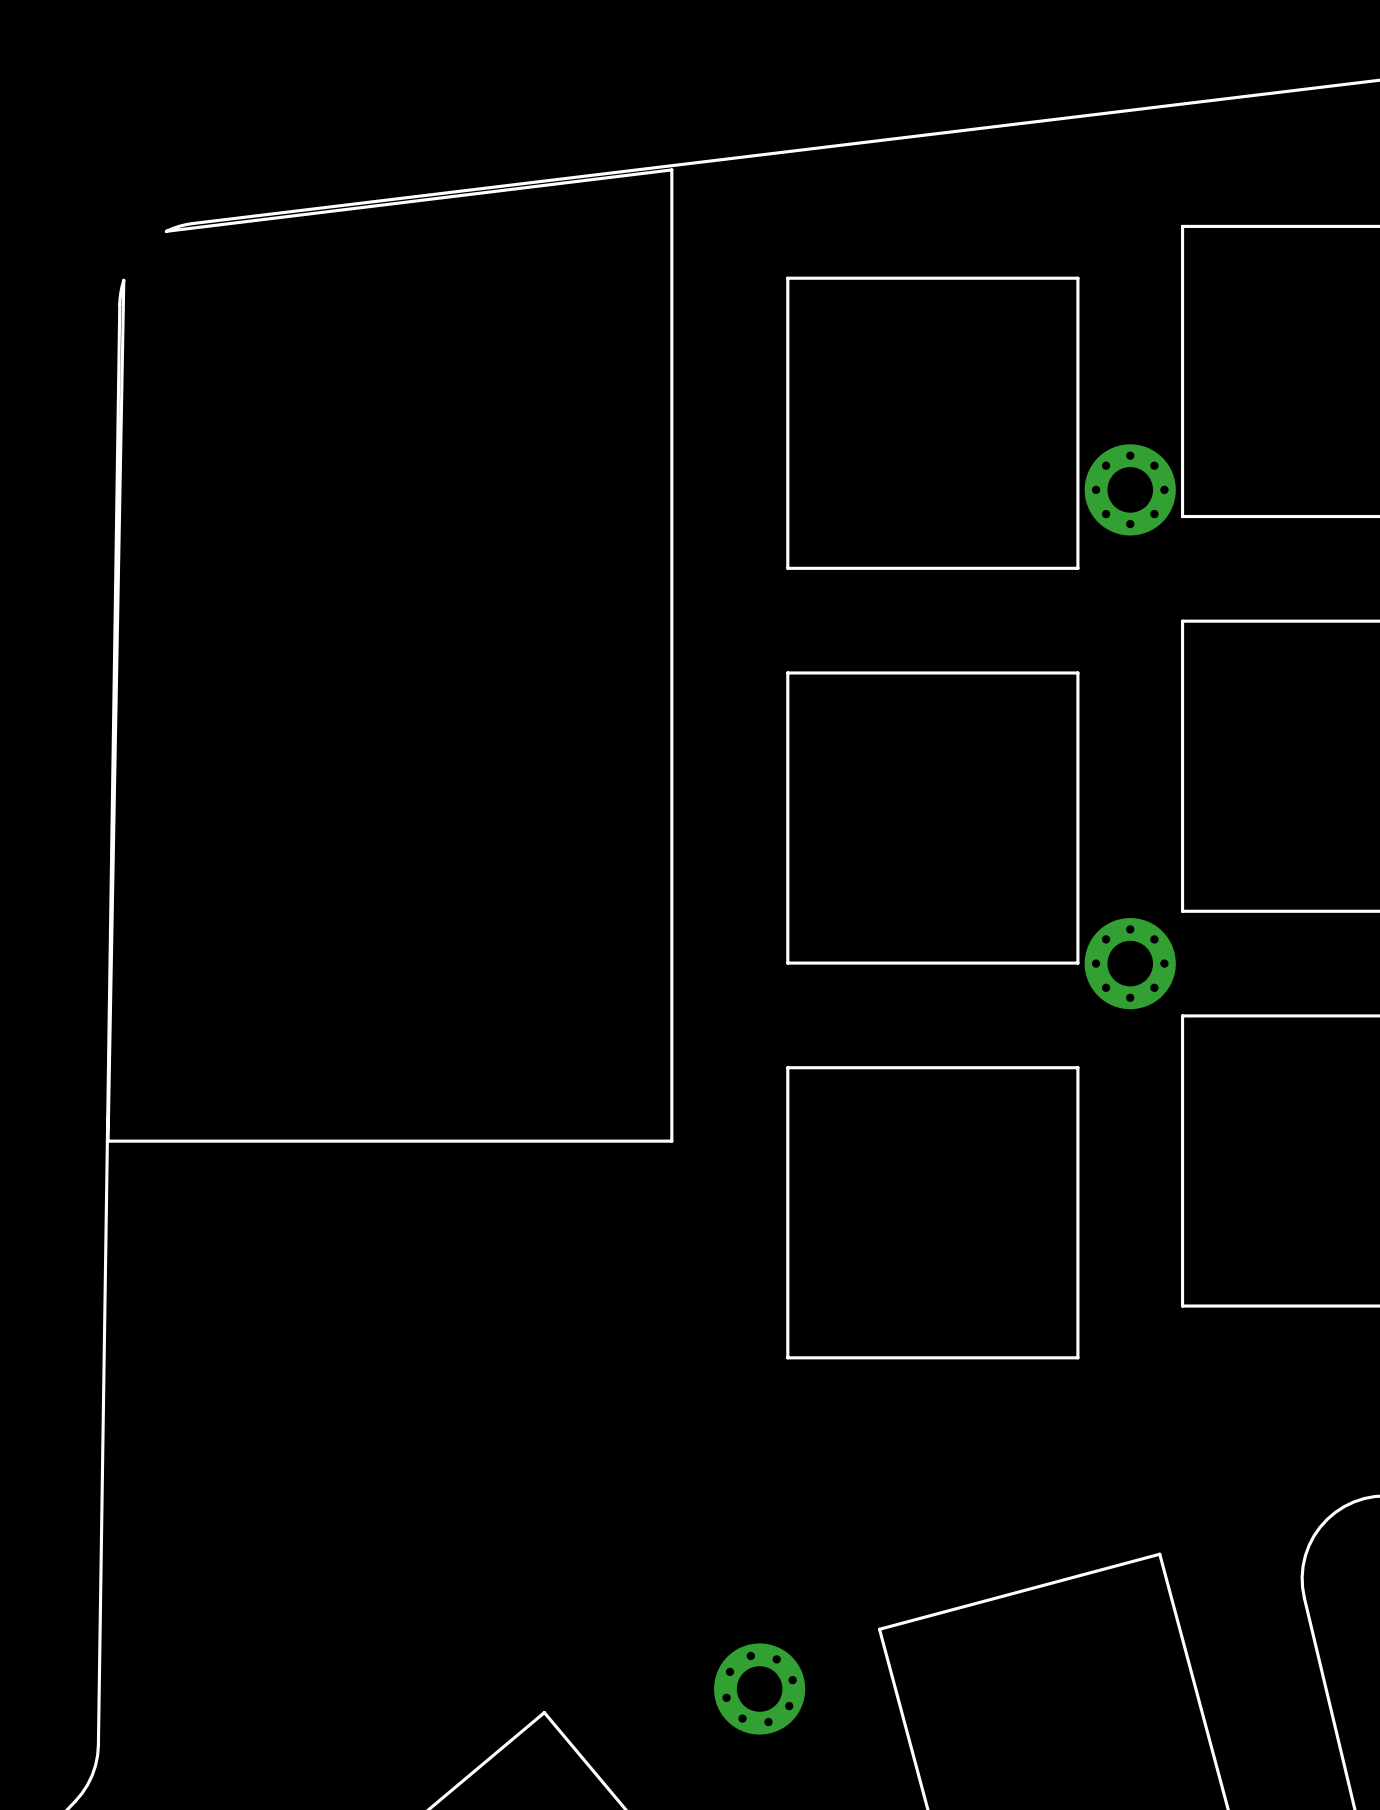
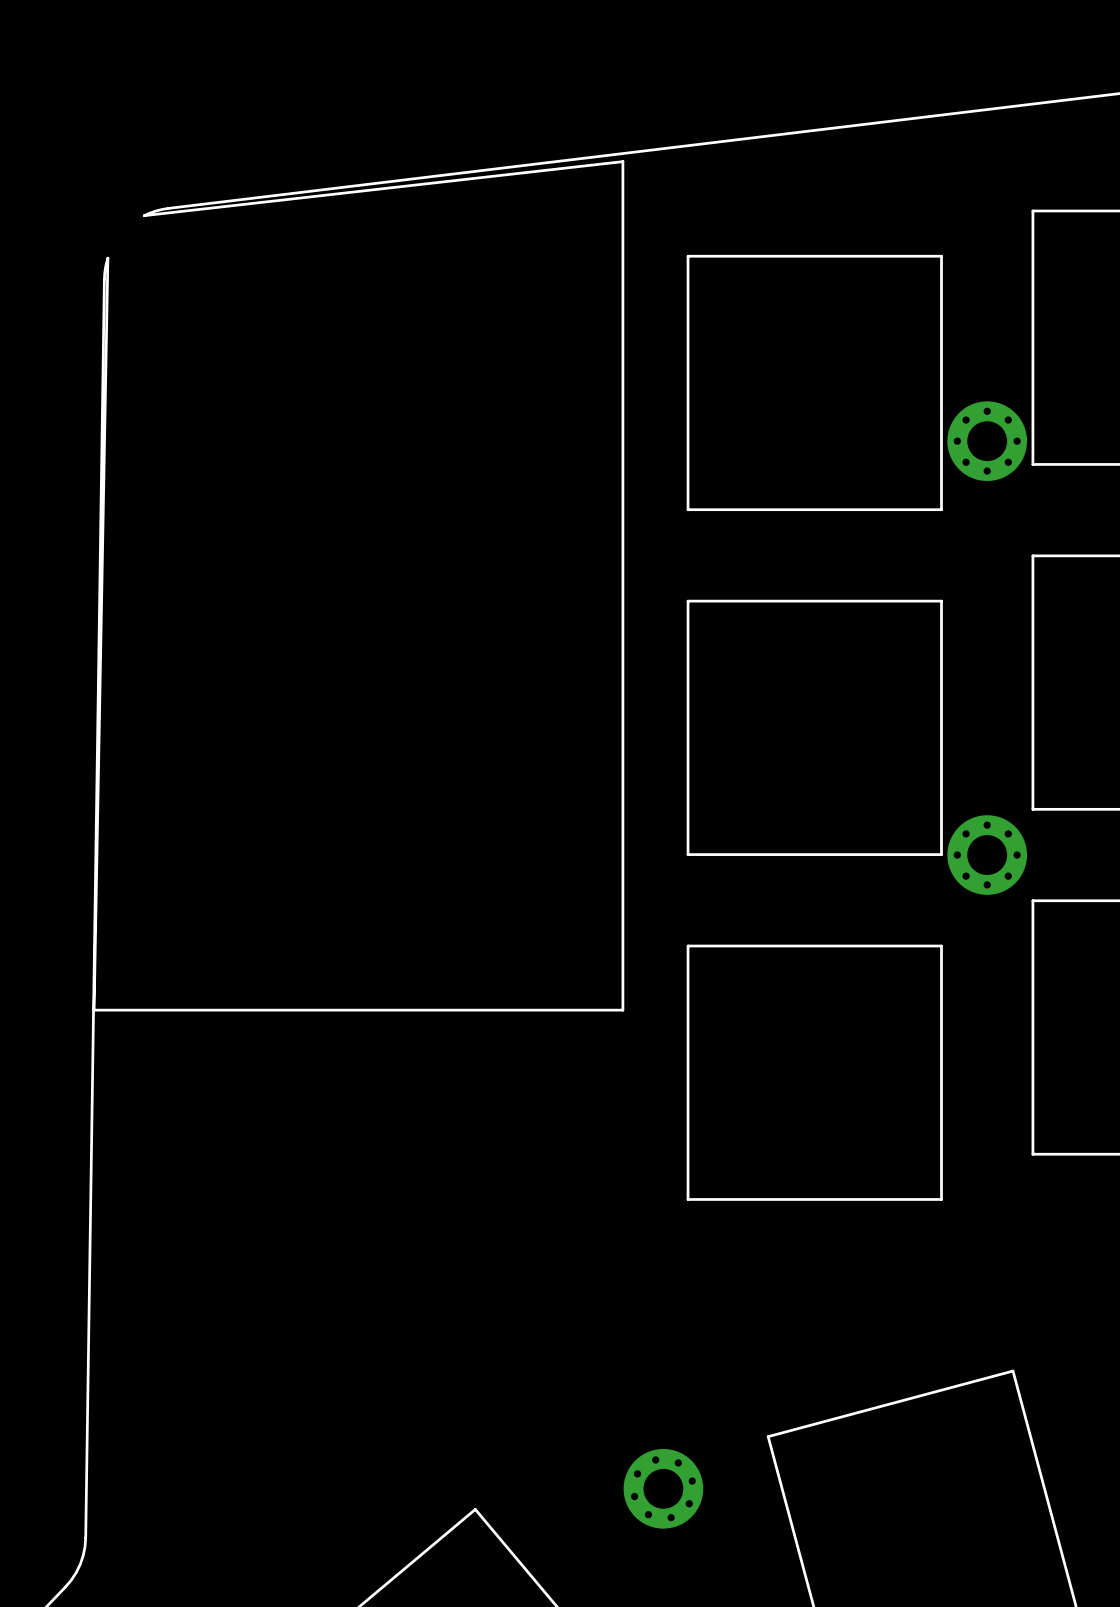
board edge: (192, 223) (166, 231) (671, 169) (671, 1141) -> (168, 208) (144, 215) (622, 161) (622, 1010) (586, 1010)

